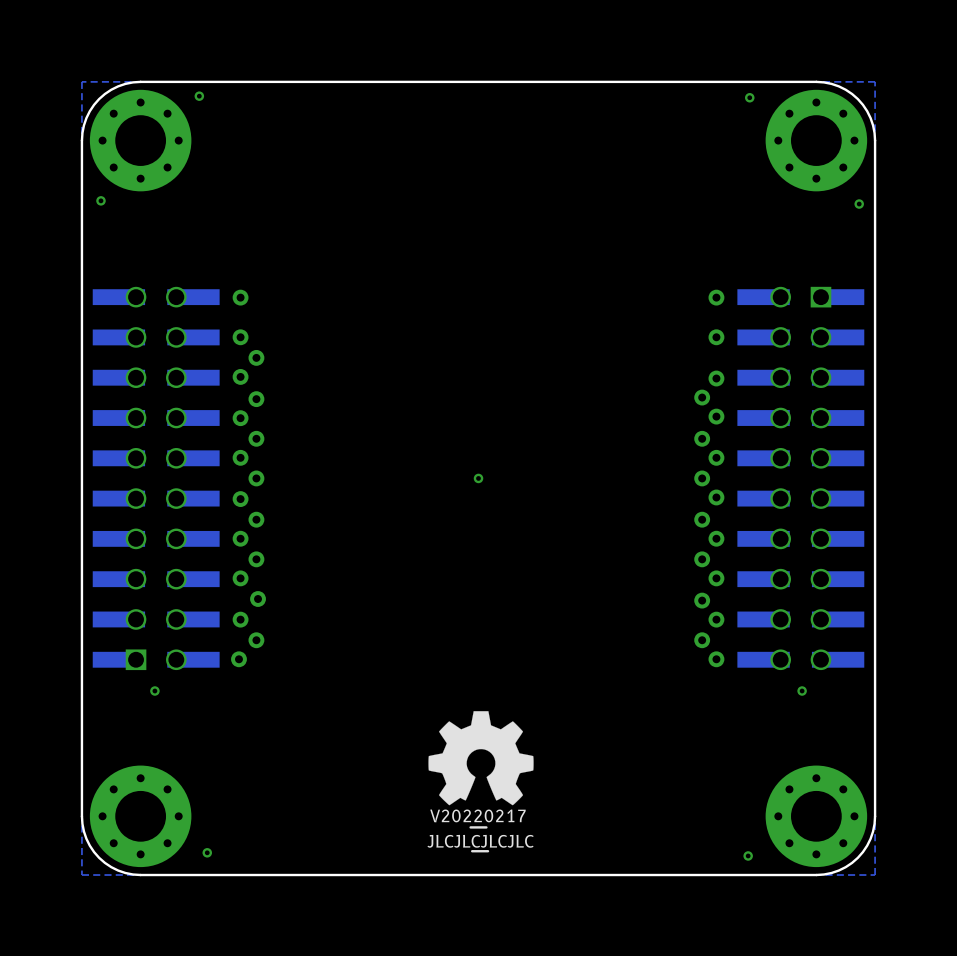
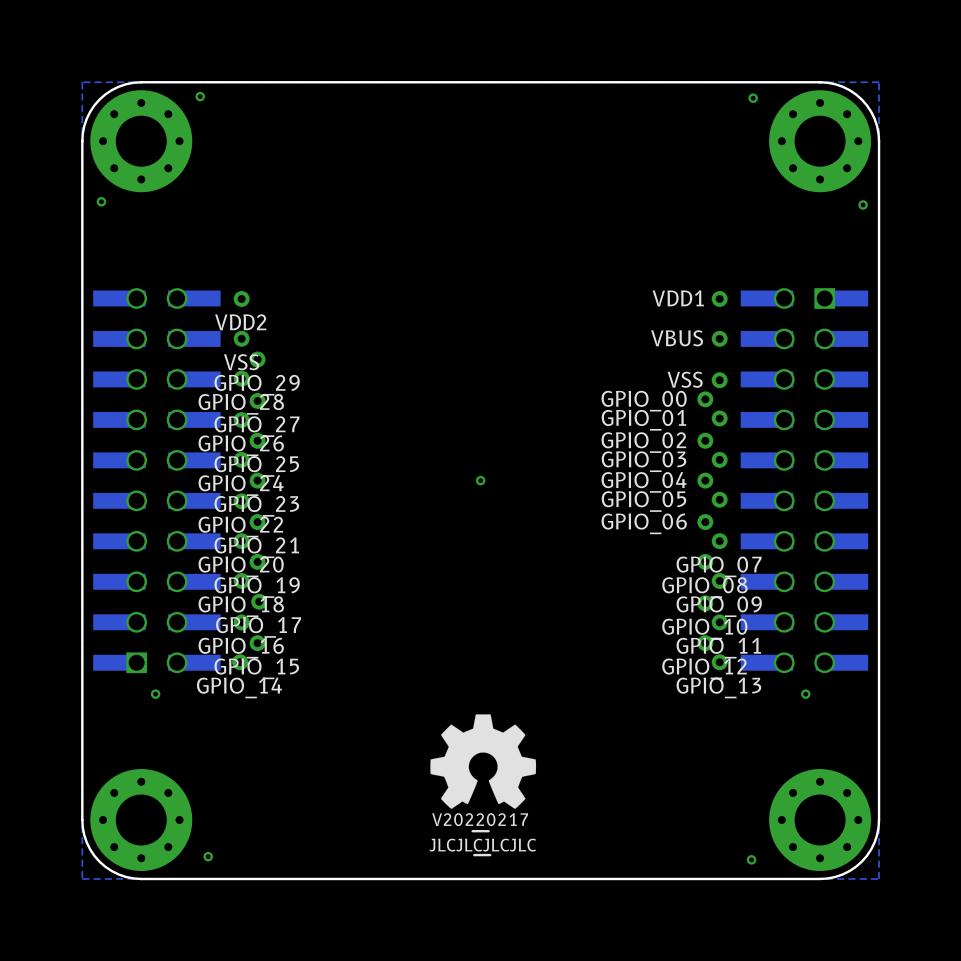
part value: none -> VDD1 (678, 298)
part value: none -> VDD2 (240, 322)
part value: none -> VBUS (677, 338)
part value: none -> VSS (241, 362)
part value: none -> VSS (685, 379)
part value: none -> GPIO_29 (257, 385)
part value: none -> GPIO_00 (644, 401)
part value: none -> GPIO_28 (241, 404)
part value: none -> GPIO_01 (643, 420)
part value: none -> GPIO_27 (257, 426)
part value: none -> GPIO_02 (643, 442)
part value: none -> GPIO_26 (241, 445)
part value: none -> GPIO_03 (644, 461)
part value: none -> GPIO_25 (256, 466)
part value: none -> GPIO_04 (644, 482)
part value: none -> GPIO_24 (241, 485)
part value: none -> GPIO_05 (643, 501)
part value: none -> GPIO_23 (256, 506)
part value: none -> GPIO_06 (644, 523)
part value: none -> GPIO_22 (240, 527)
part value: none -> GPIO_21 (256, 547)
part value: none -> GPIO_20 (241, 566)
part value: none -> GPIO_07 (719, 566)
part value: none -> GPIO_19 (257, 587)
part value: none -> GPIO_08 (704, 587)
part value: none -> GPIO_18 (241, 606)
part value: none -> GPIO_09 (719, 606)
part value: none -> GPIO_17 (258, 627)
part value: none -> GPIO_10 (704, 629)
part value: none -> GPIO_16 (241, 648)
part value: none -> GPIO_11 (718, 648)
part value: none -> GPIO_15 (256, 668)
part value: none -> GPIO_12 (704, 668)
part value: none -> GPIO_14 (239, 687)
part value: none -> GPIO_13 (718, 687)

